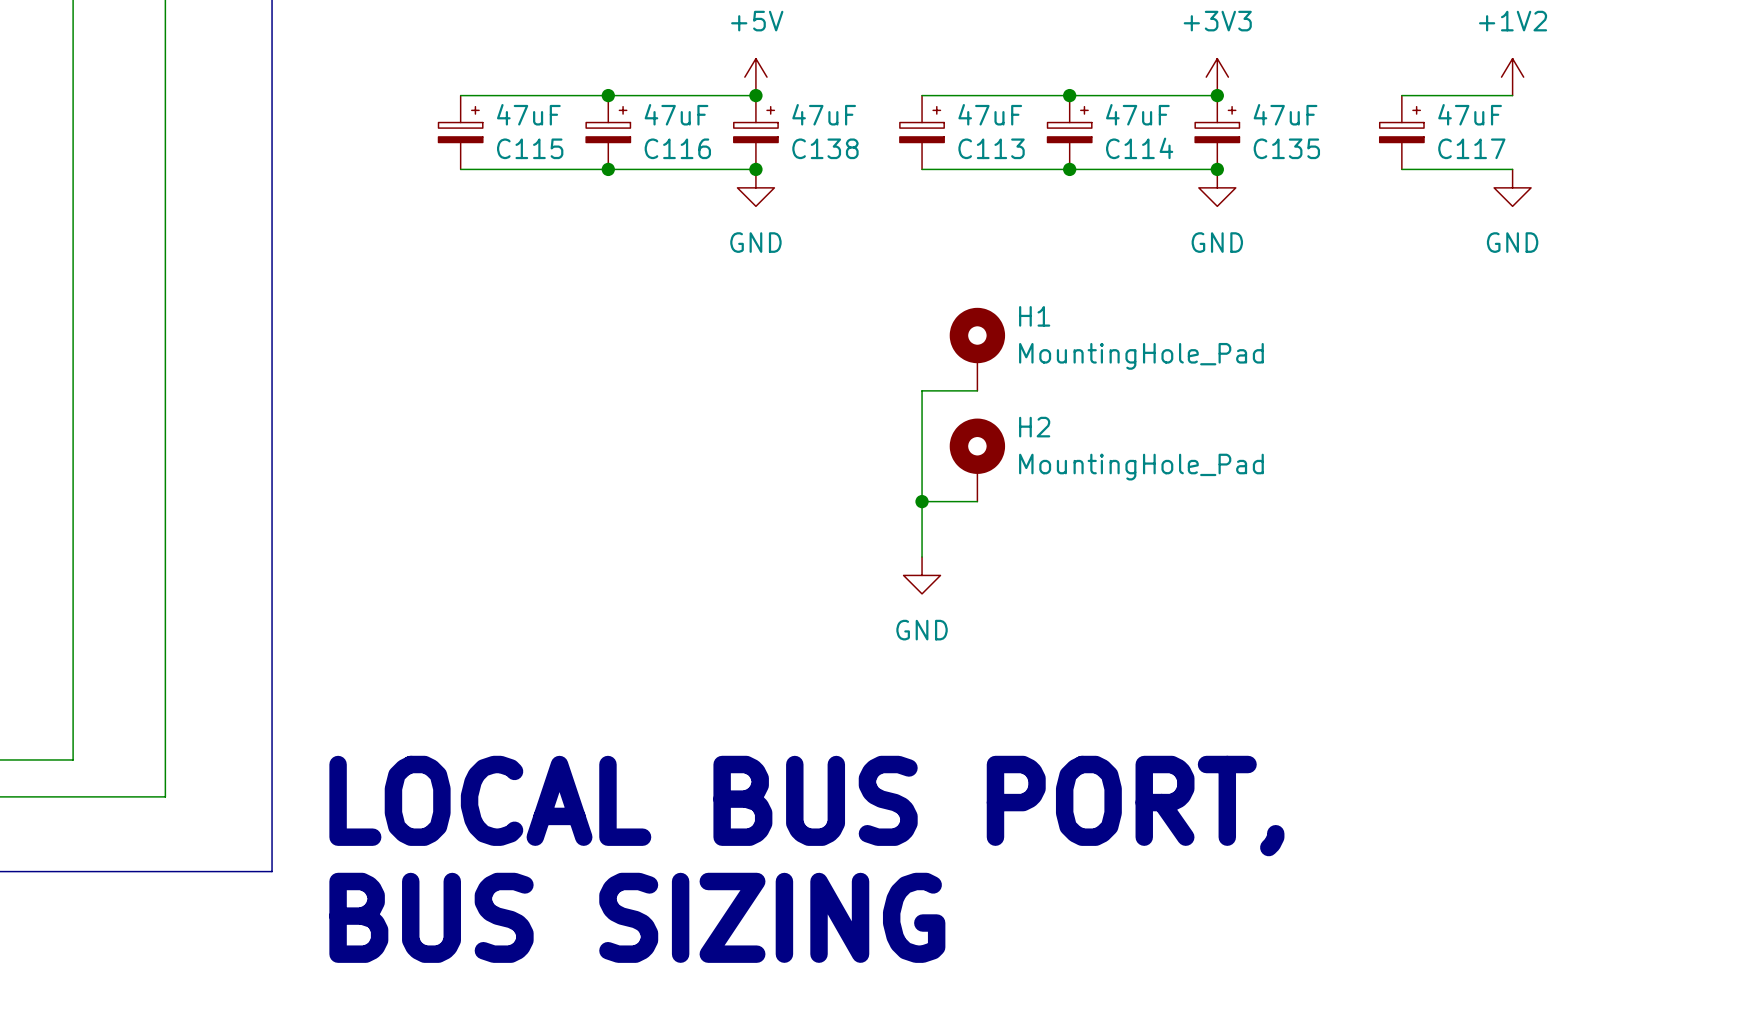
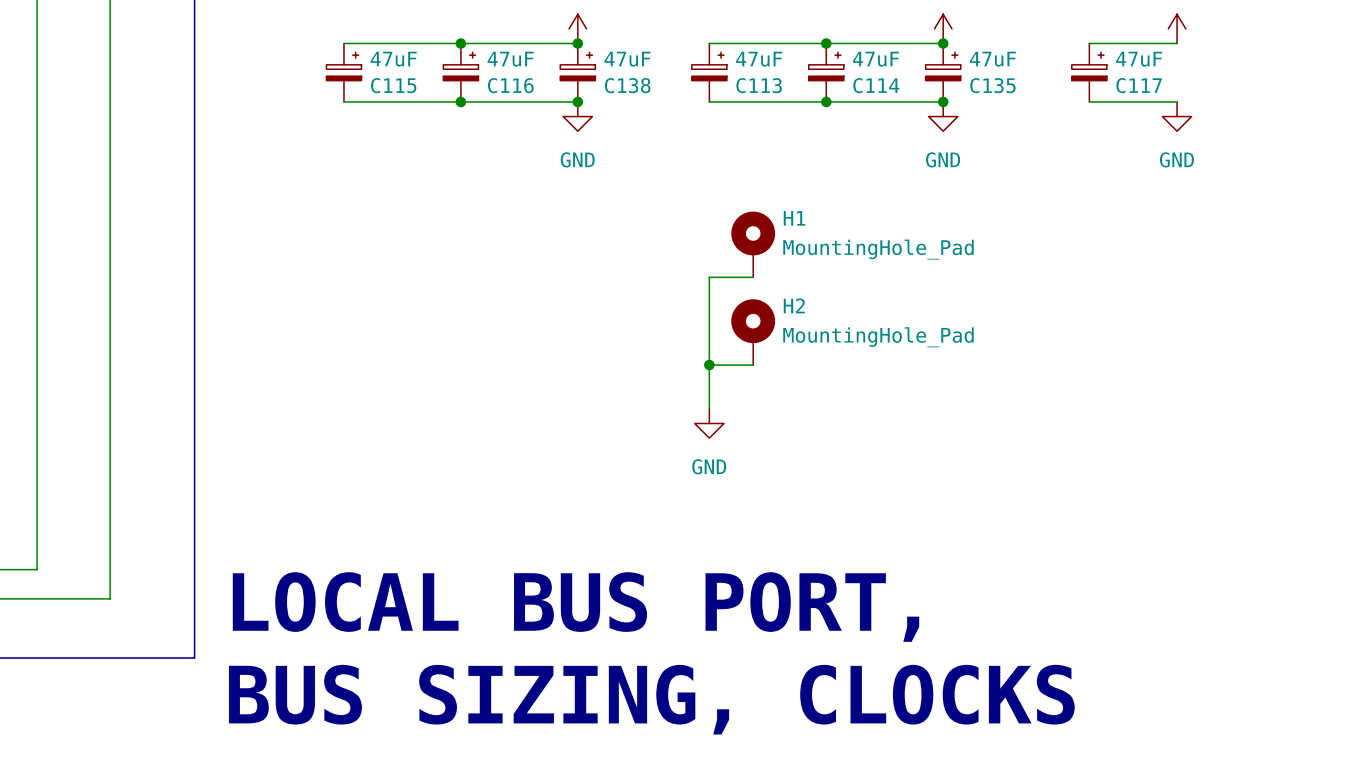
text: BUS SIZING (637, 917) -> BUS SIZING, CLOCKS (651, 699)

